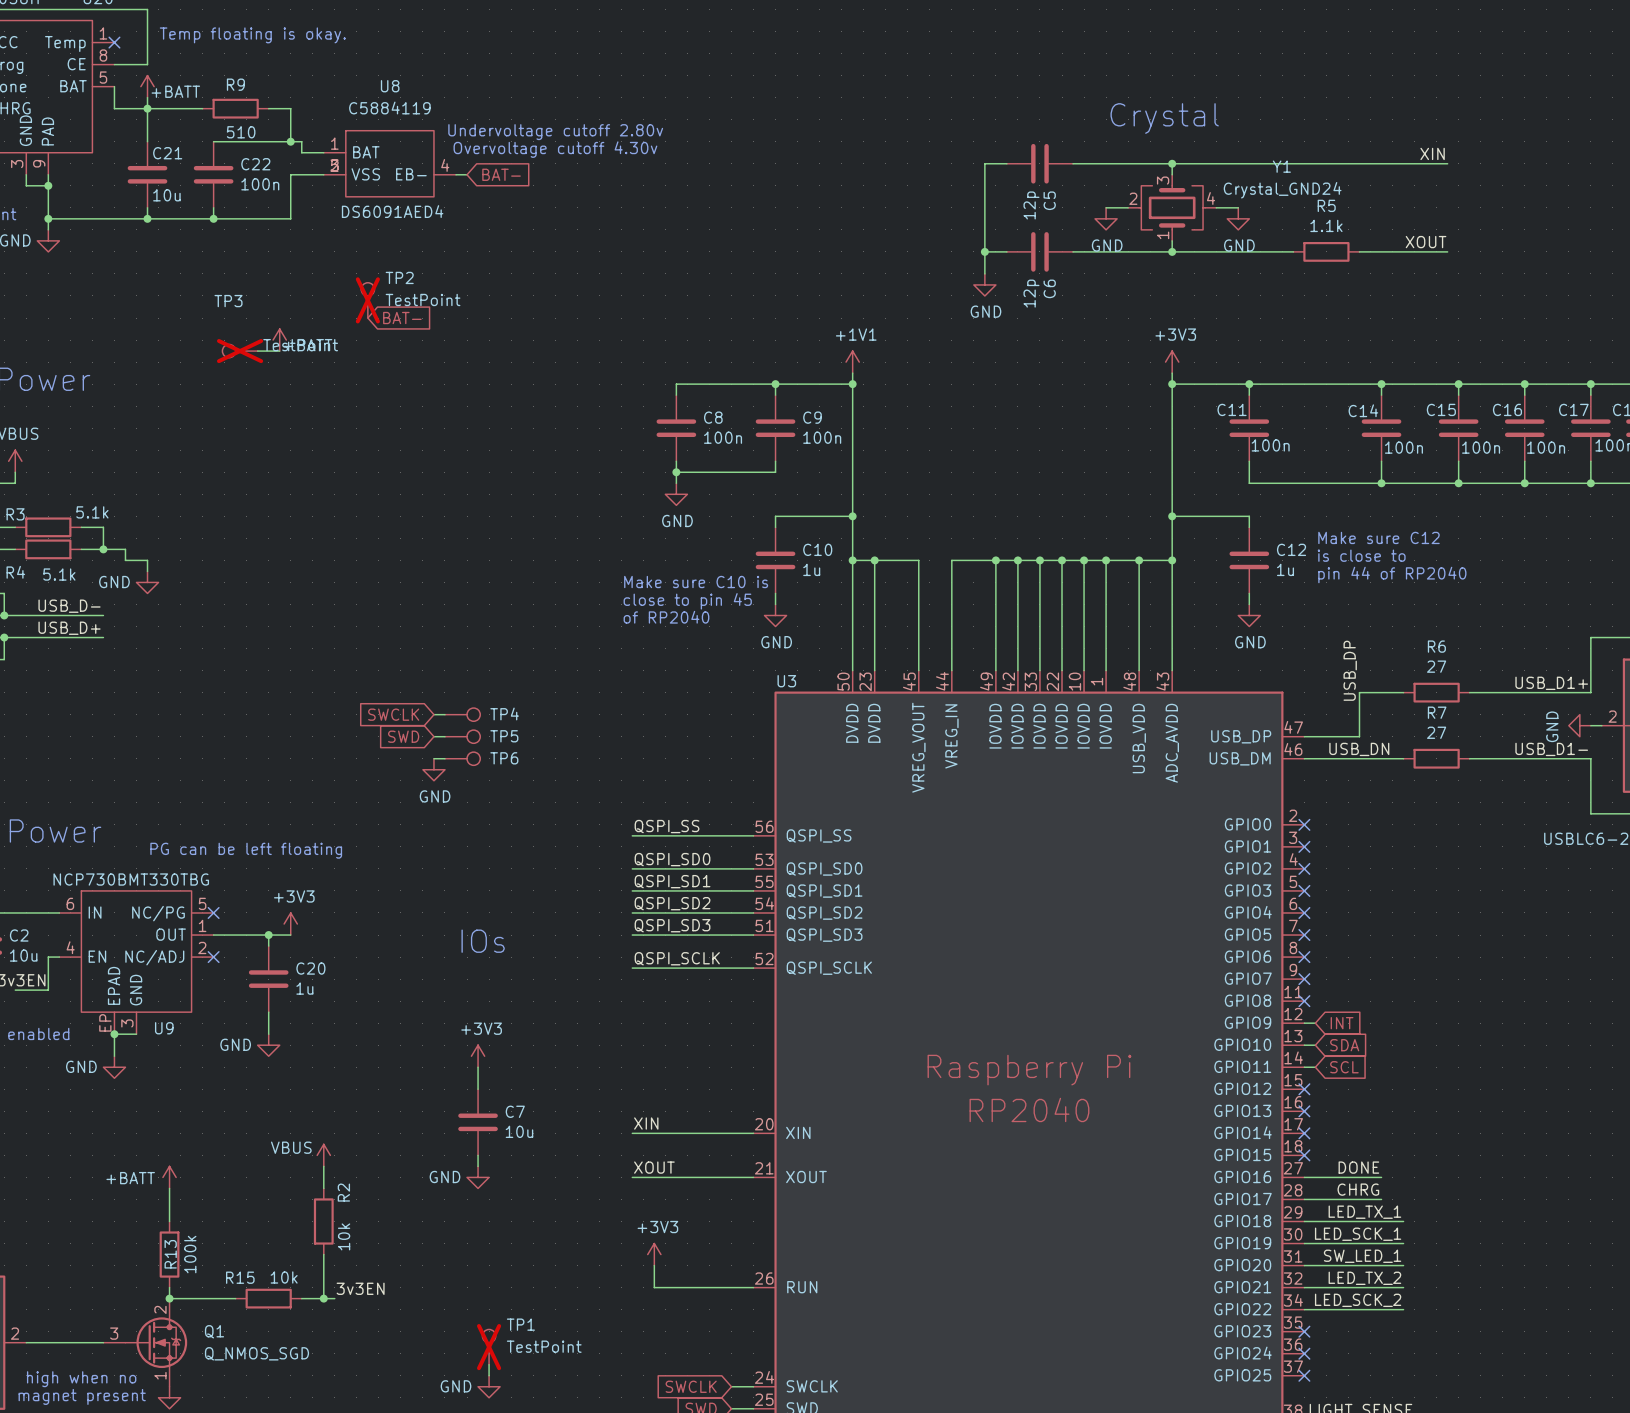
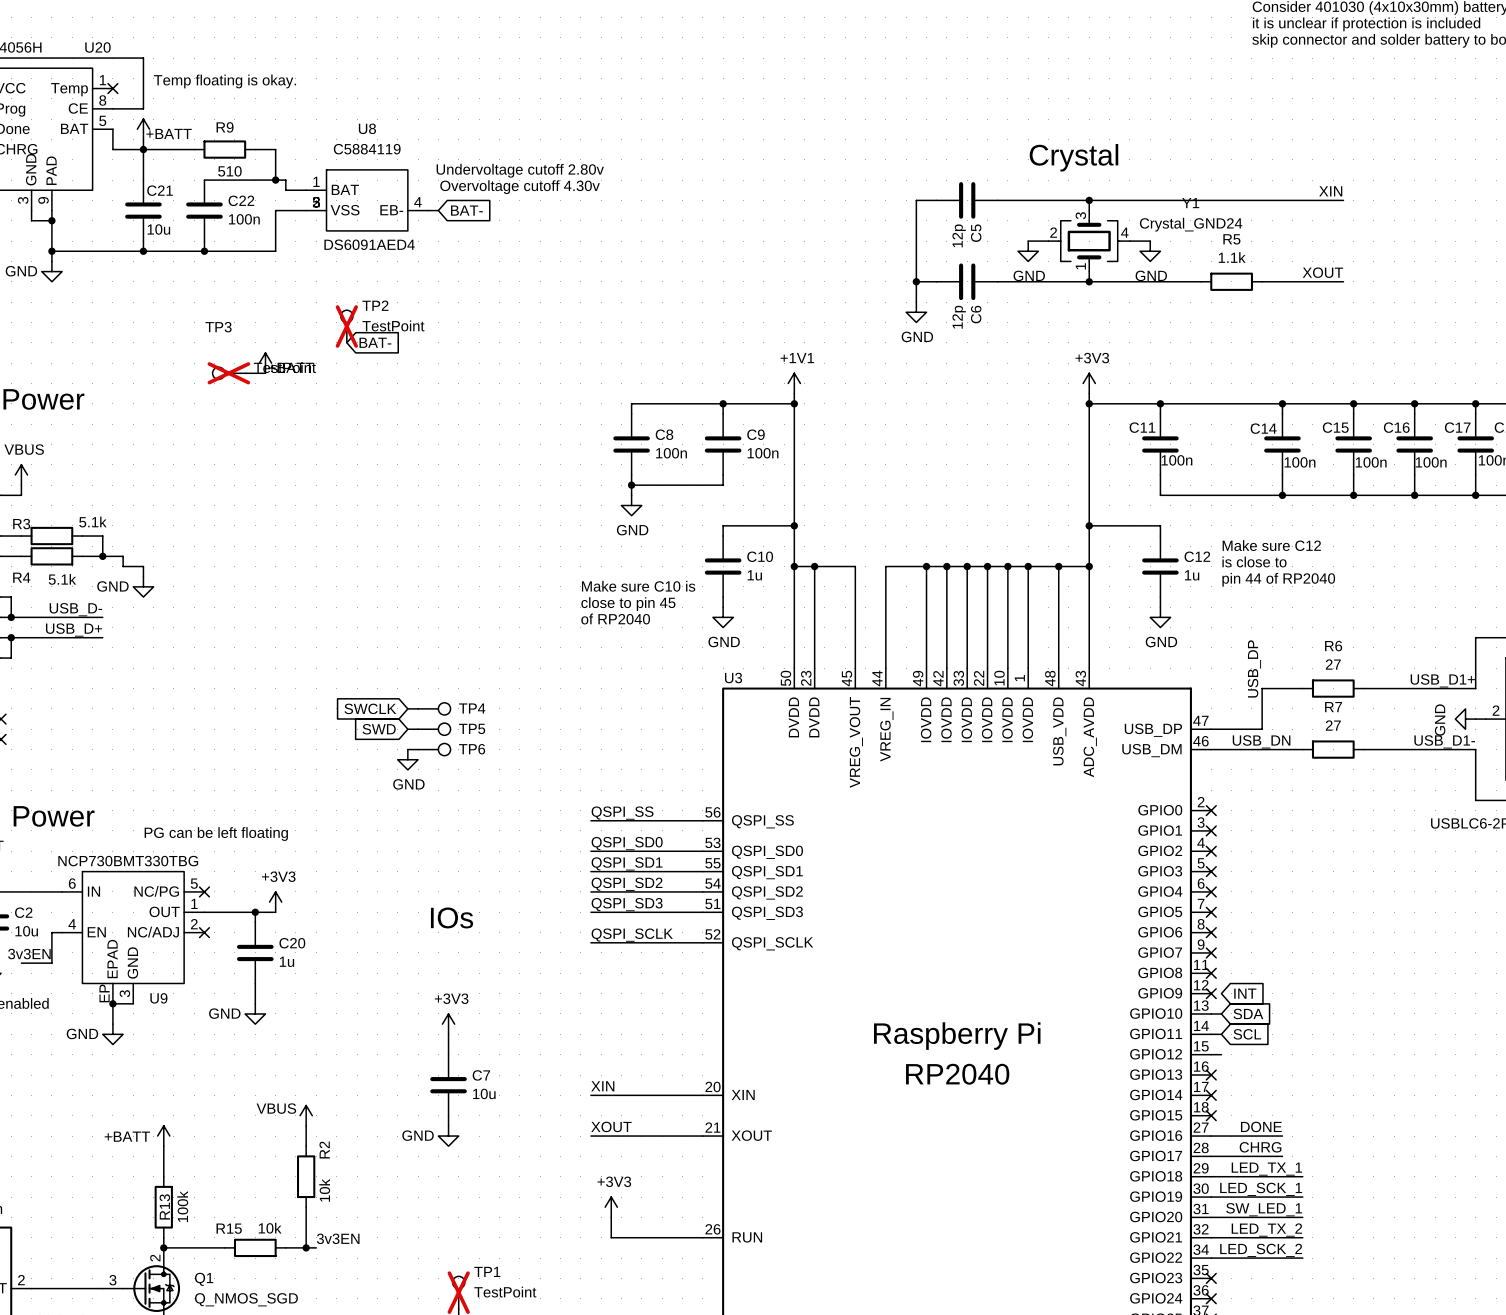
wire: (1304, 1023) (1315, 1023) -> (1211, 1054) (1221, 1054)
no-connect mark: none -> (1211, 993)
no-connect mark: (1304, 1089) -> none

